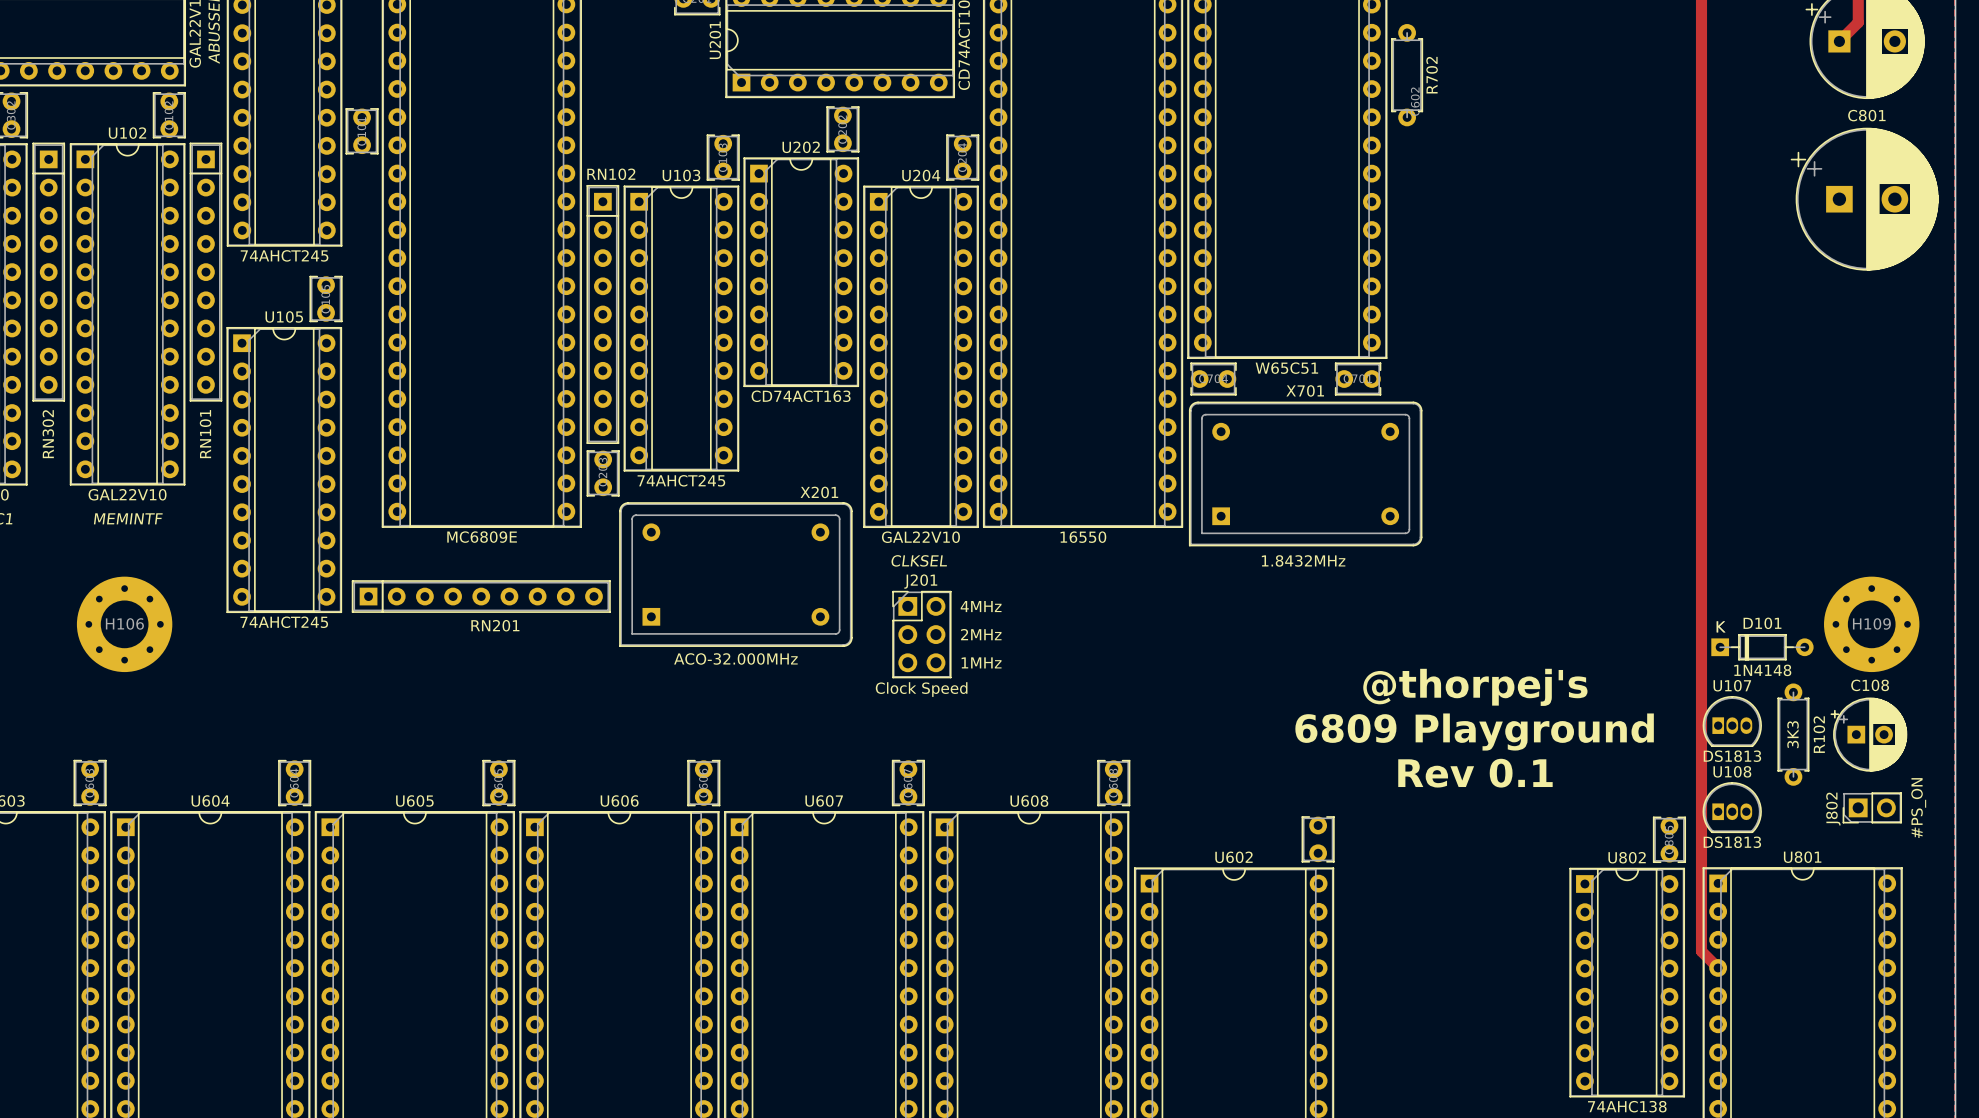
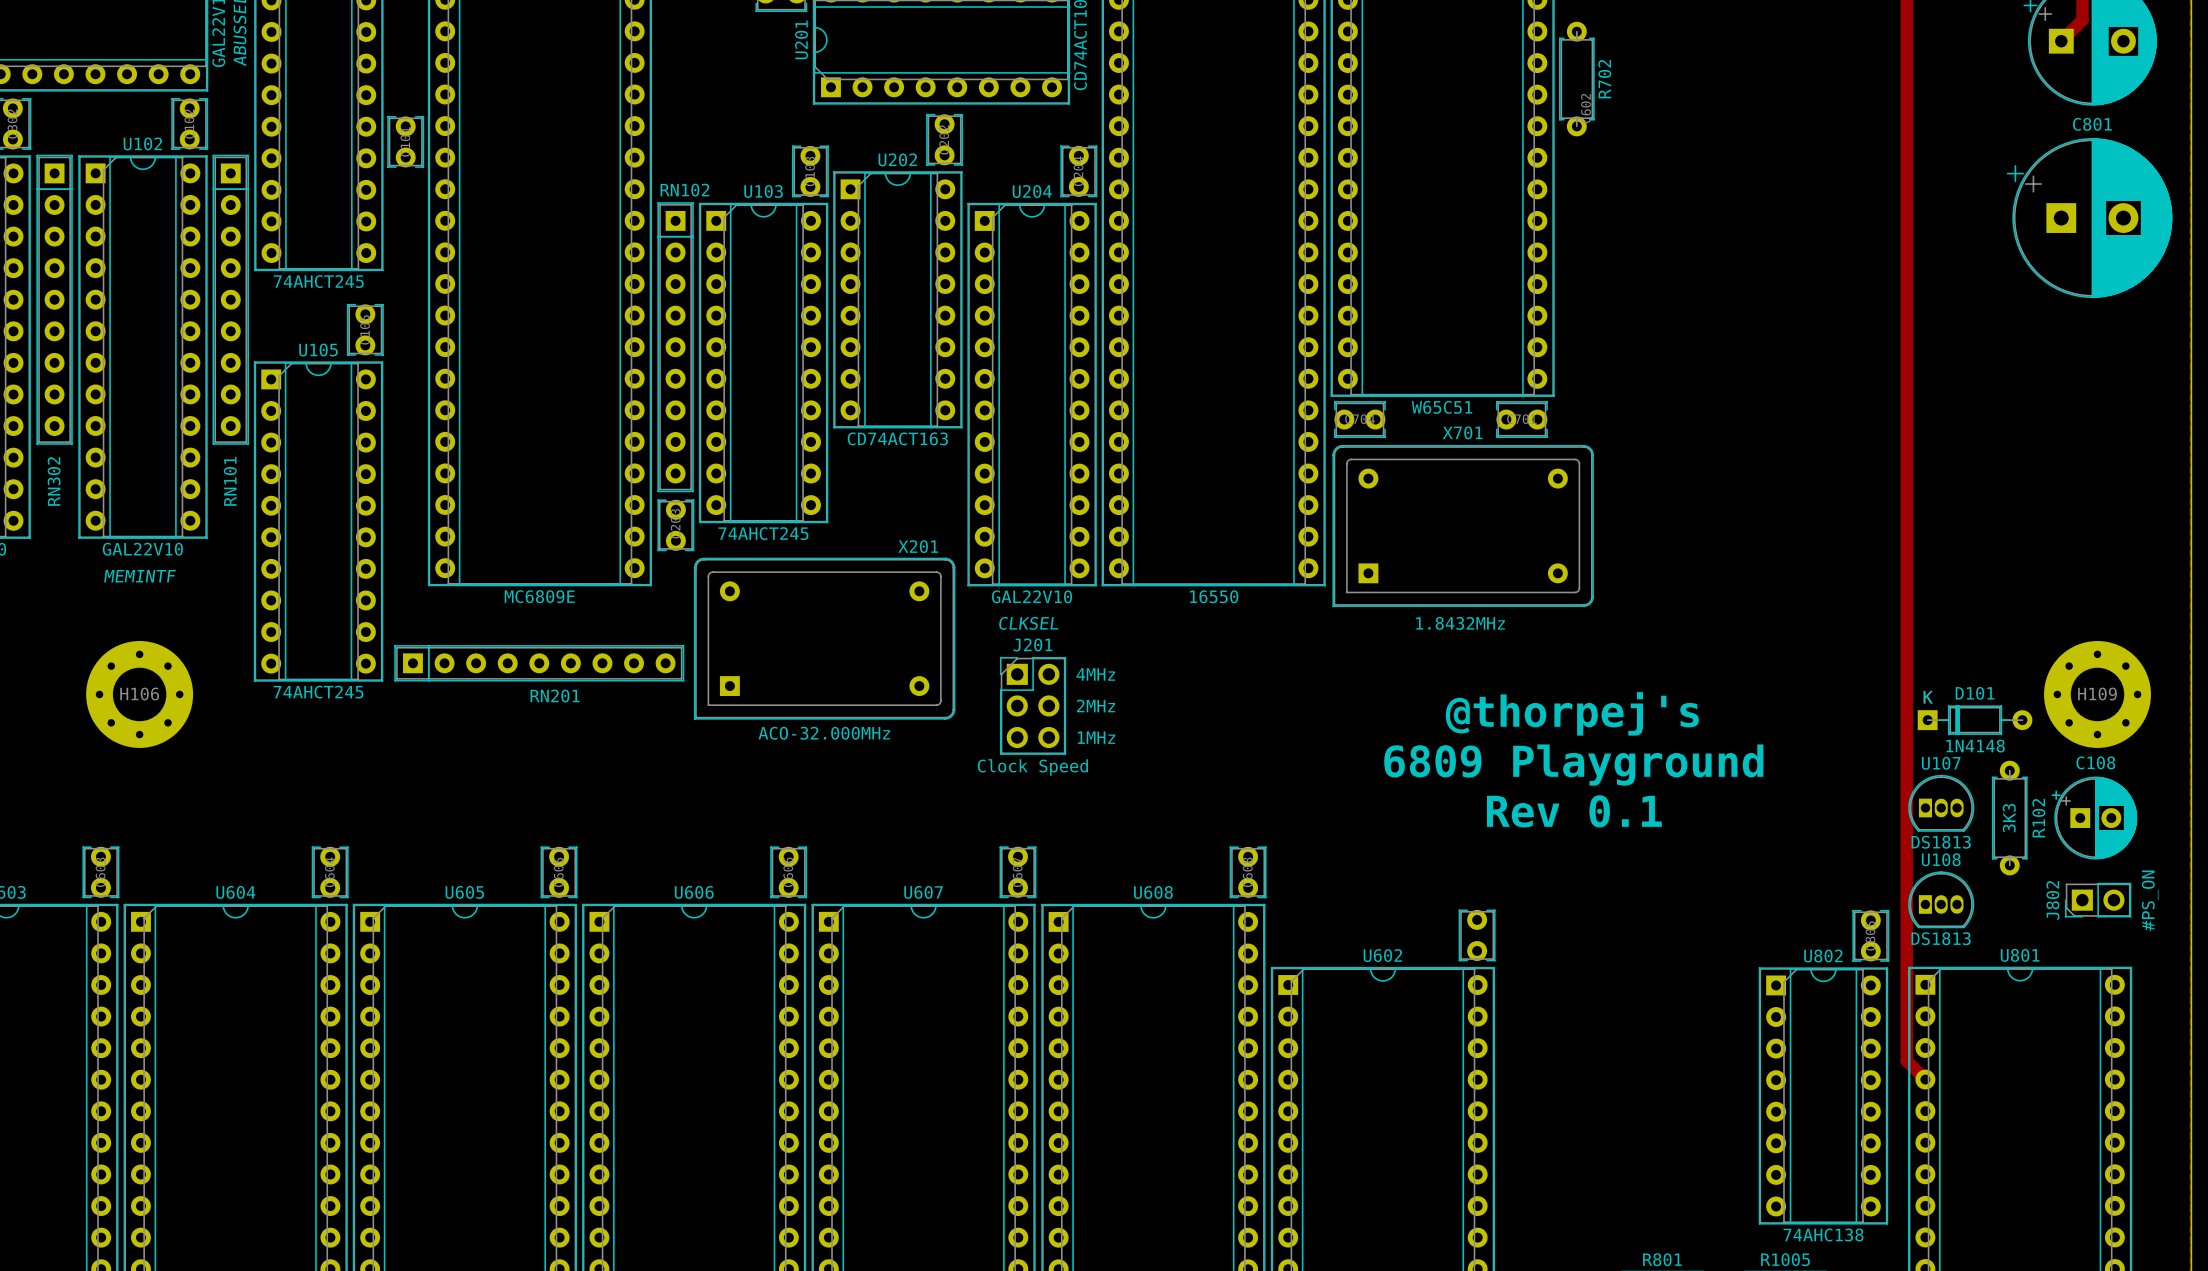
text position: @thorpej's (1475, 687) -> @thorpej's (1572, 713)
text position: 6809 Playground (1474, 732) -> 6809 Playground (1573, 765)
text position: Rev 0.1 (1475, 773) -> Rev 0.1 (1574, 811)

